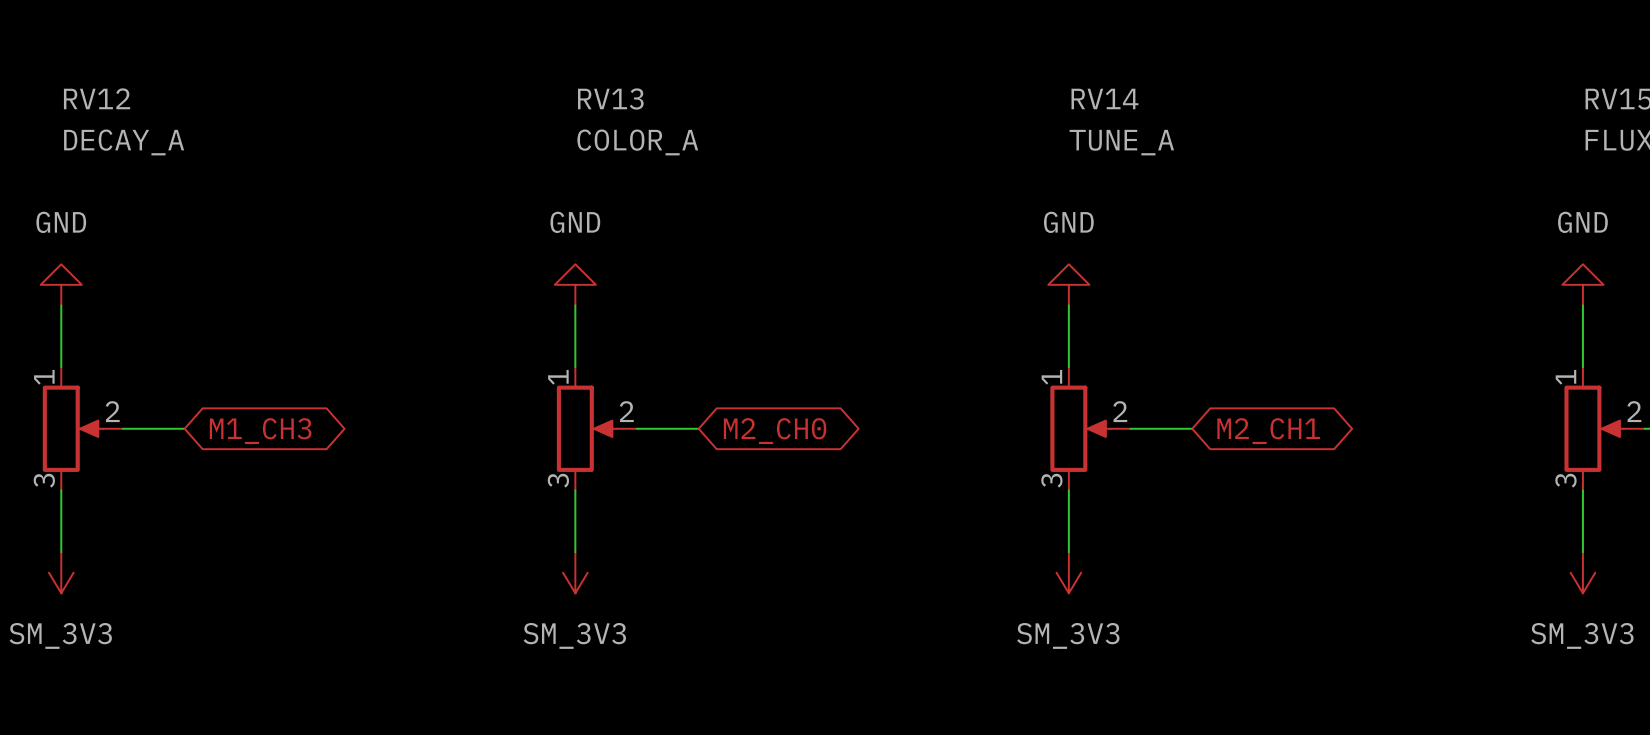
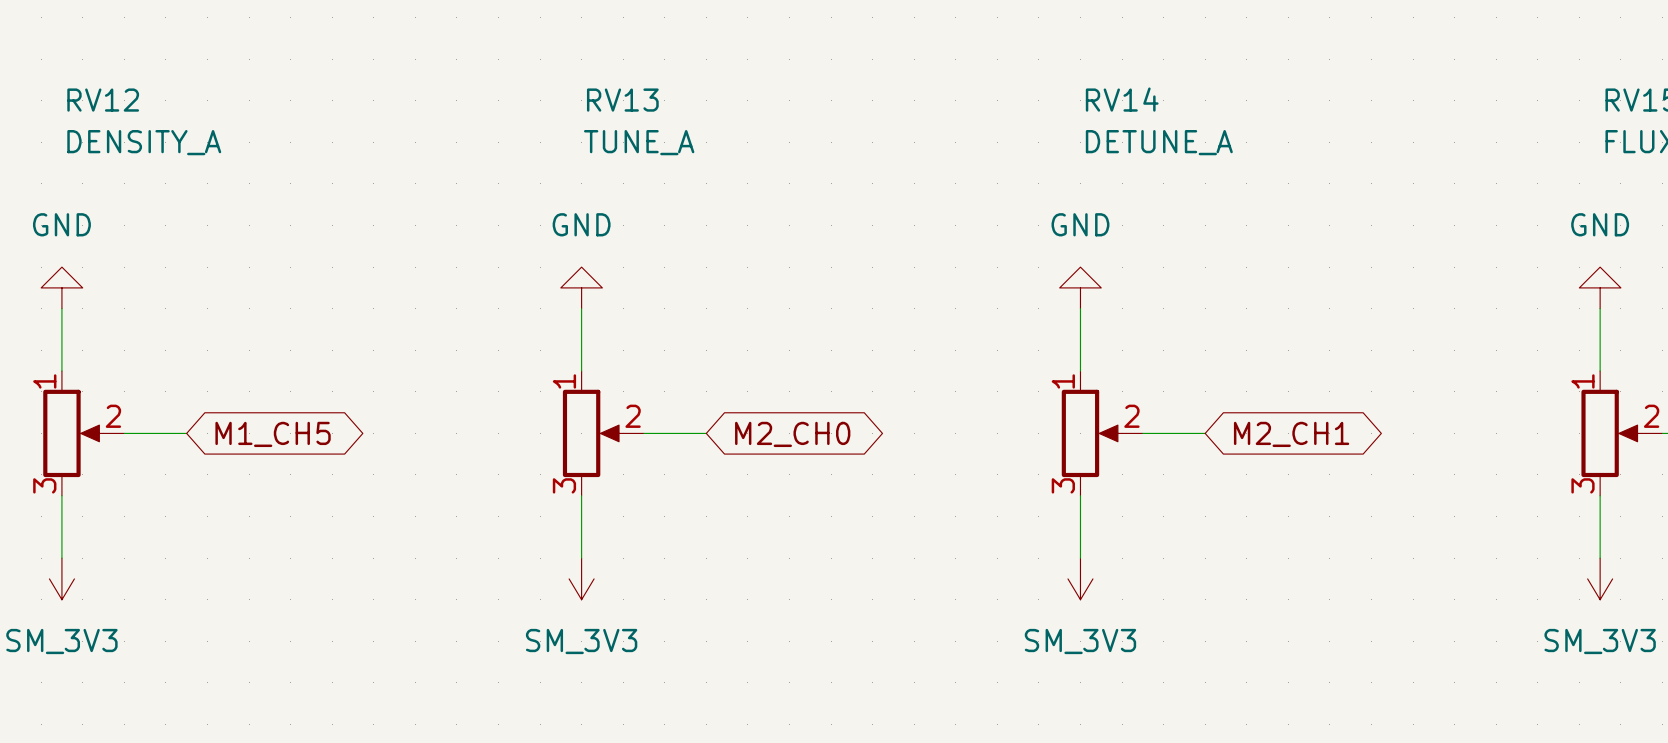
RV12 value: DECAY_A (124, 142) -> DENSITY_A (144, 142)
RV13 value: COLOR_A (637, 142) -> TUNE_A (639, 142)
RV14 value: TUNE_A (1121, 142) -> DETUNE_A (1159, 142)
global label: M1_CH3 (260, 431) -> M1_CH5 (273, 434)

